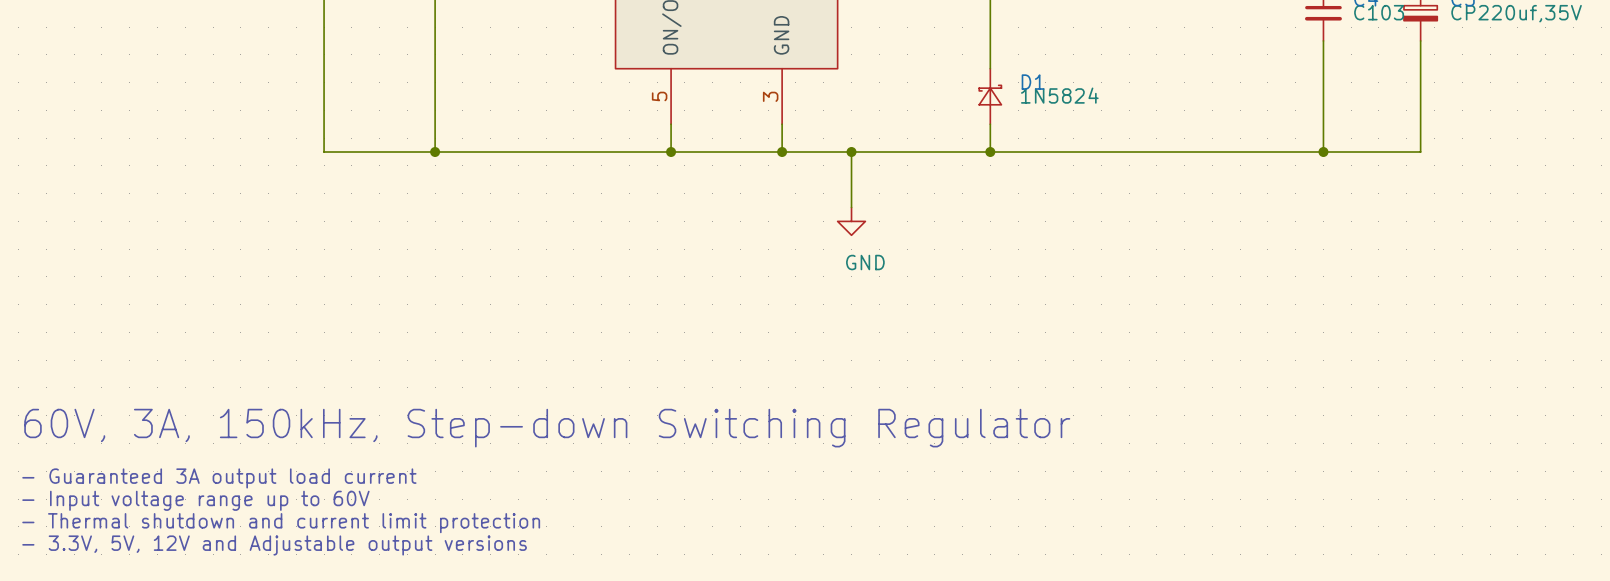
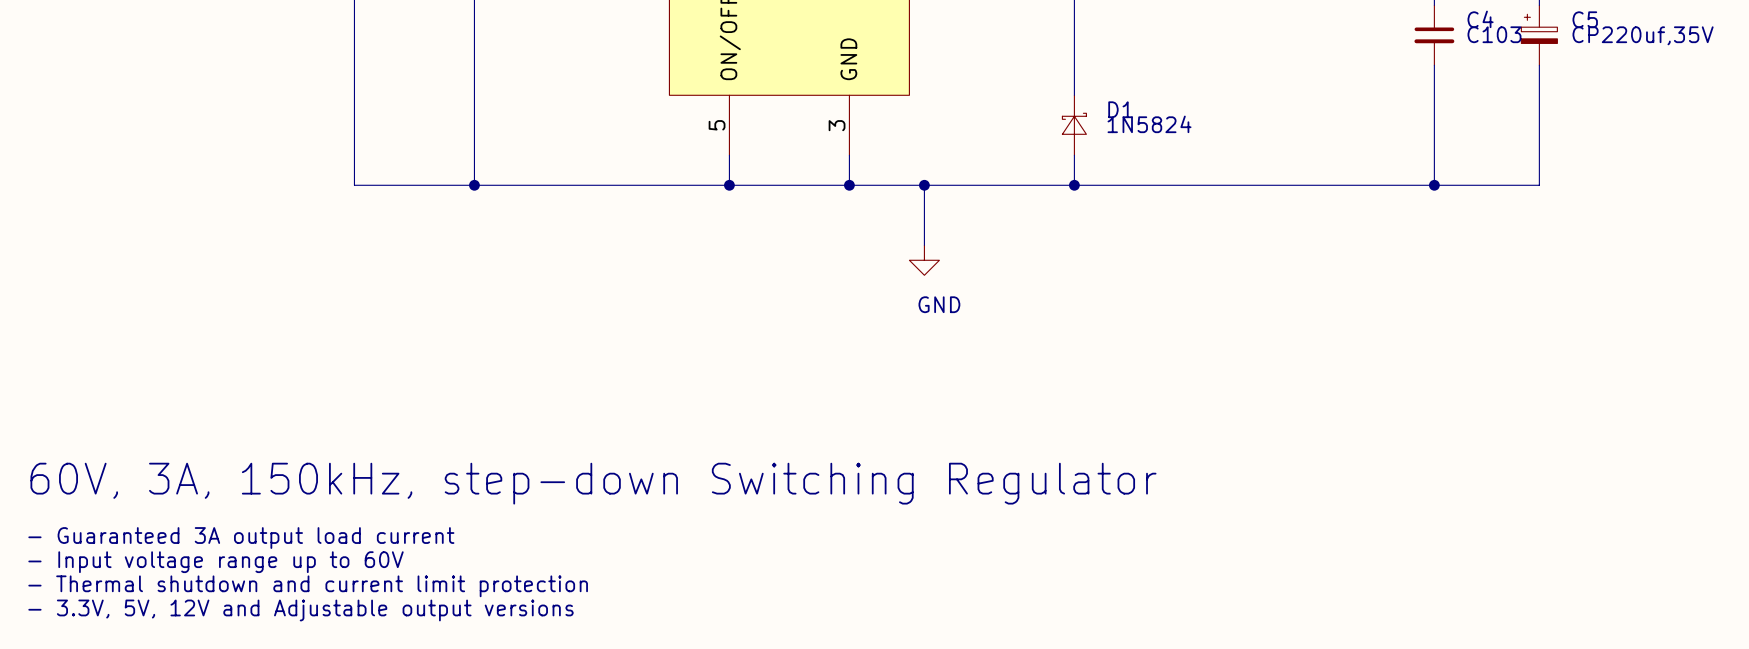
text: 60V, 3A, 150kHz, Step-down Switching Regulator (547, 428) -> 60V, 3A, 150kHz, step-down Switching Regulator (593, 483)

